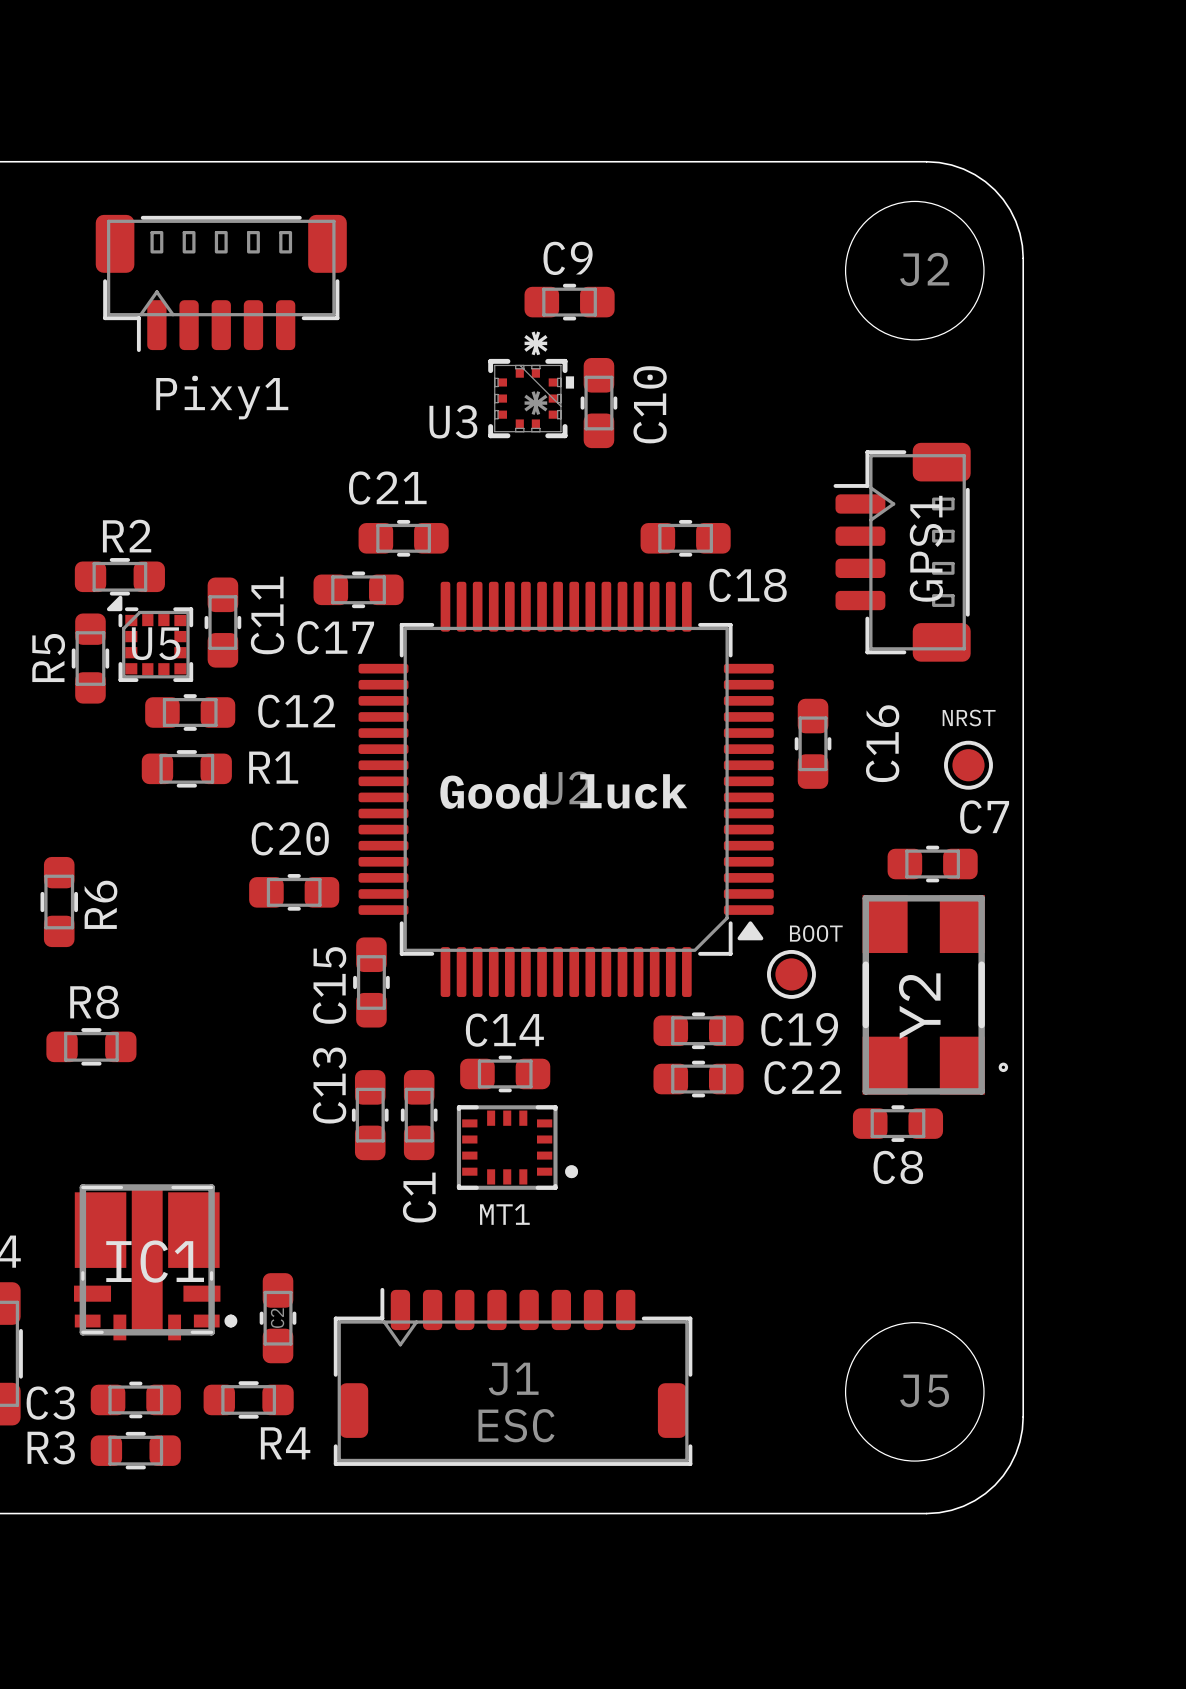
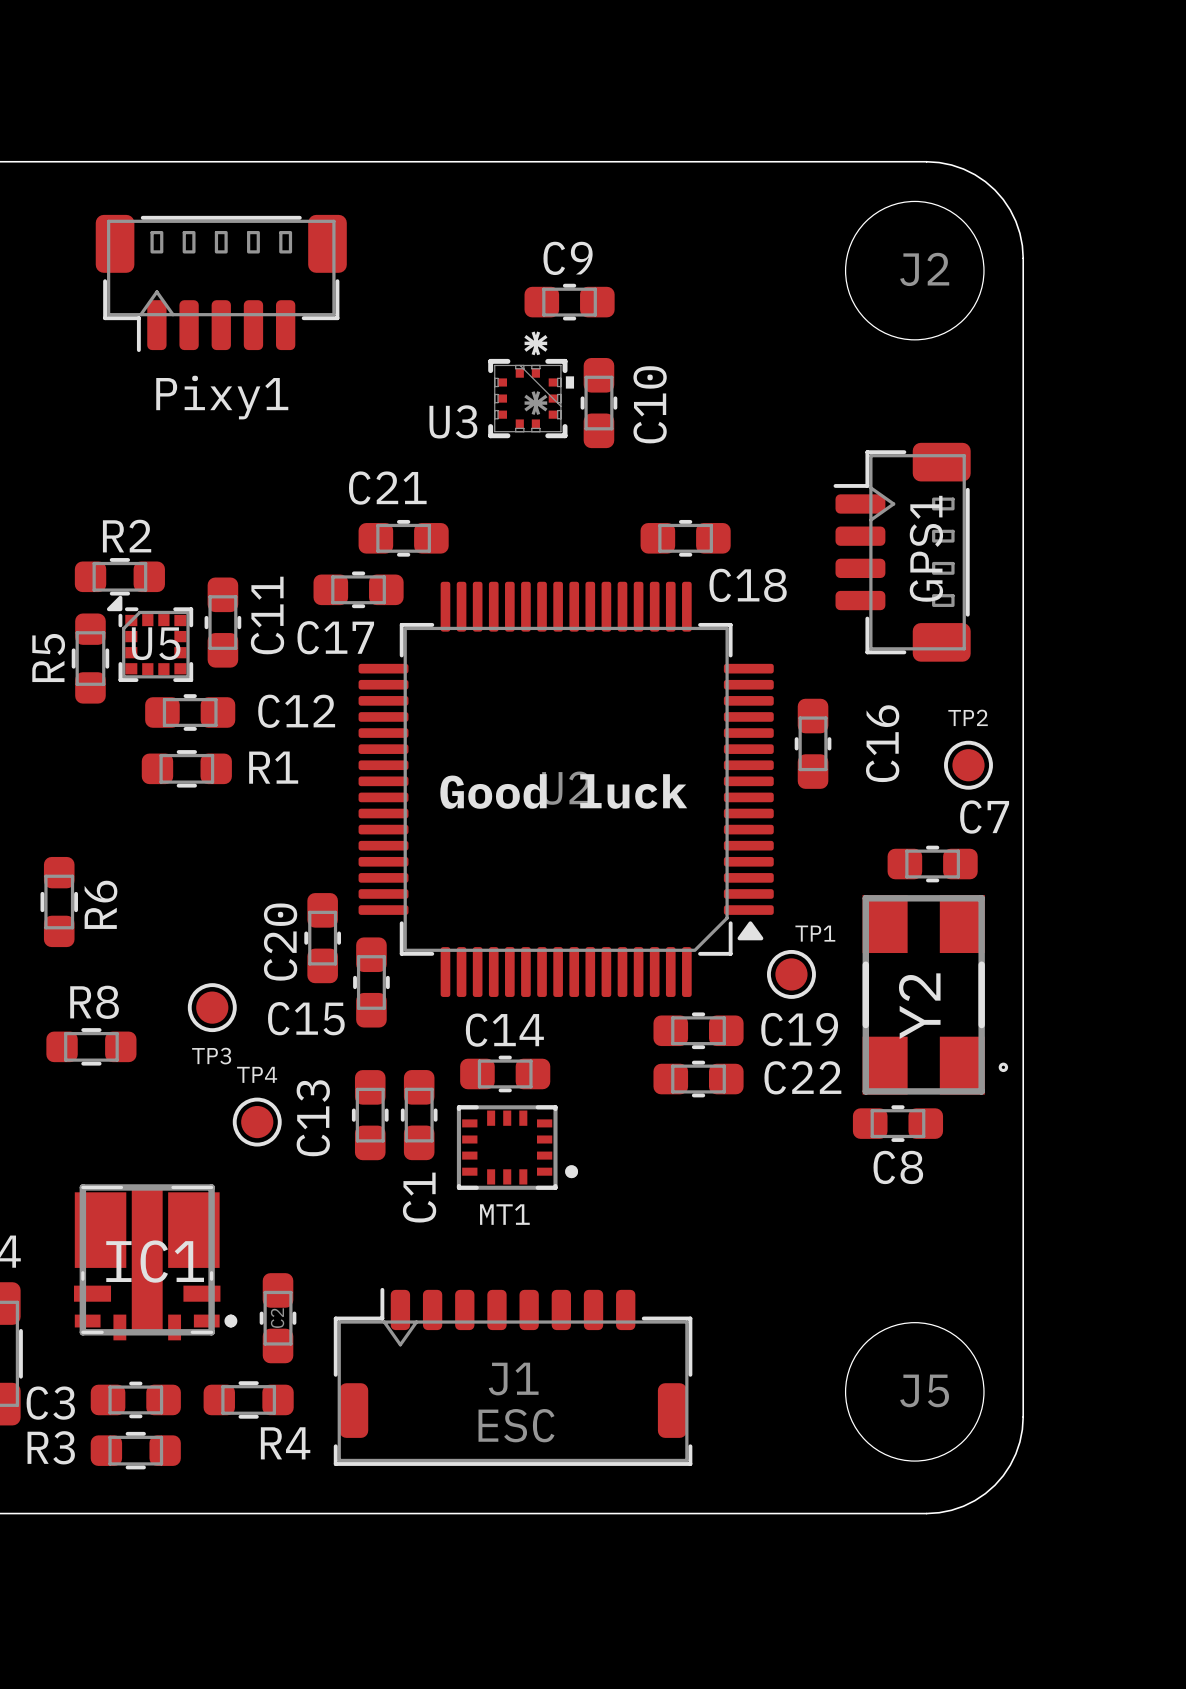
NRST name: NRST (969, 718) -> TP2 (968, 717)
C20 name position: C20 (290, 838) -> C20 (280, 942)
C20 rotation: 0° (294, 892) -> 90° clockwise (322, 938)
BOOT name: BOOT (816, 933) -> TP1 (815, 933)
C15 name rotation: 0° (329, 985) -> 90° clockwise (306, 1018)
TP3: none -> (212, 1007)
C13 name position: C13 (329, 1085) -> C13 (313, 1118)
TP4: none -> (257, 1122)

